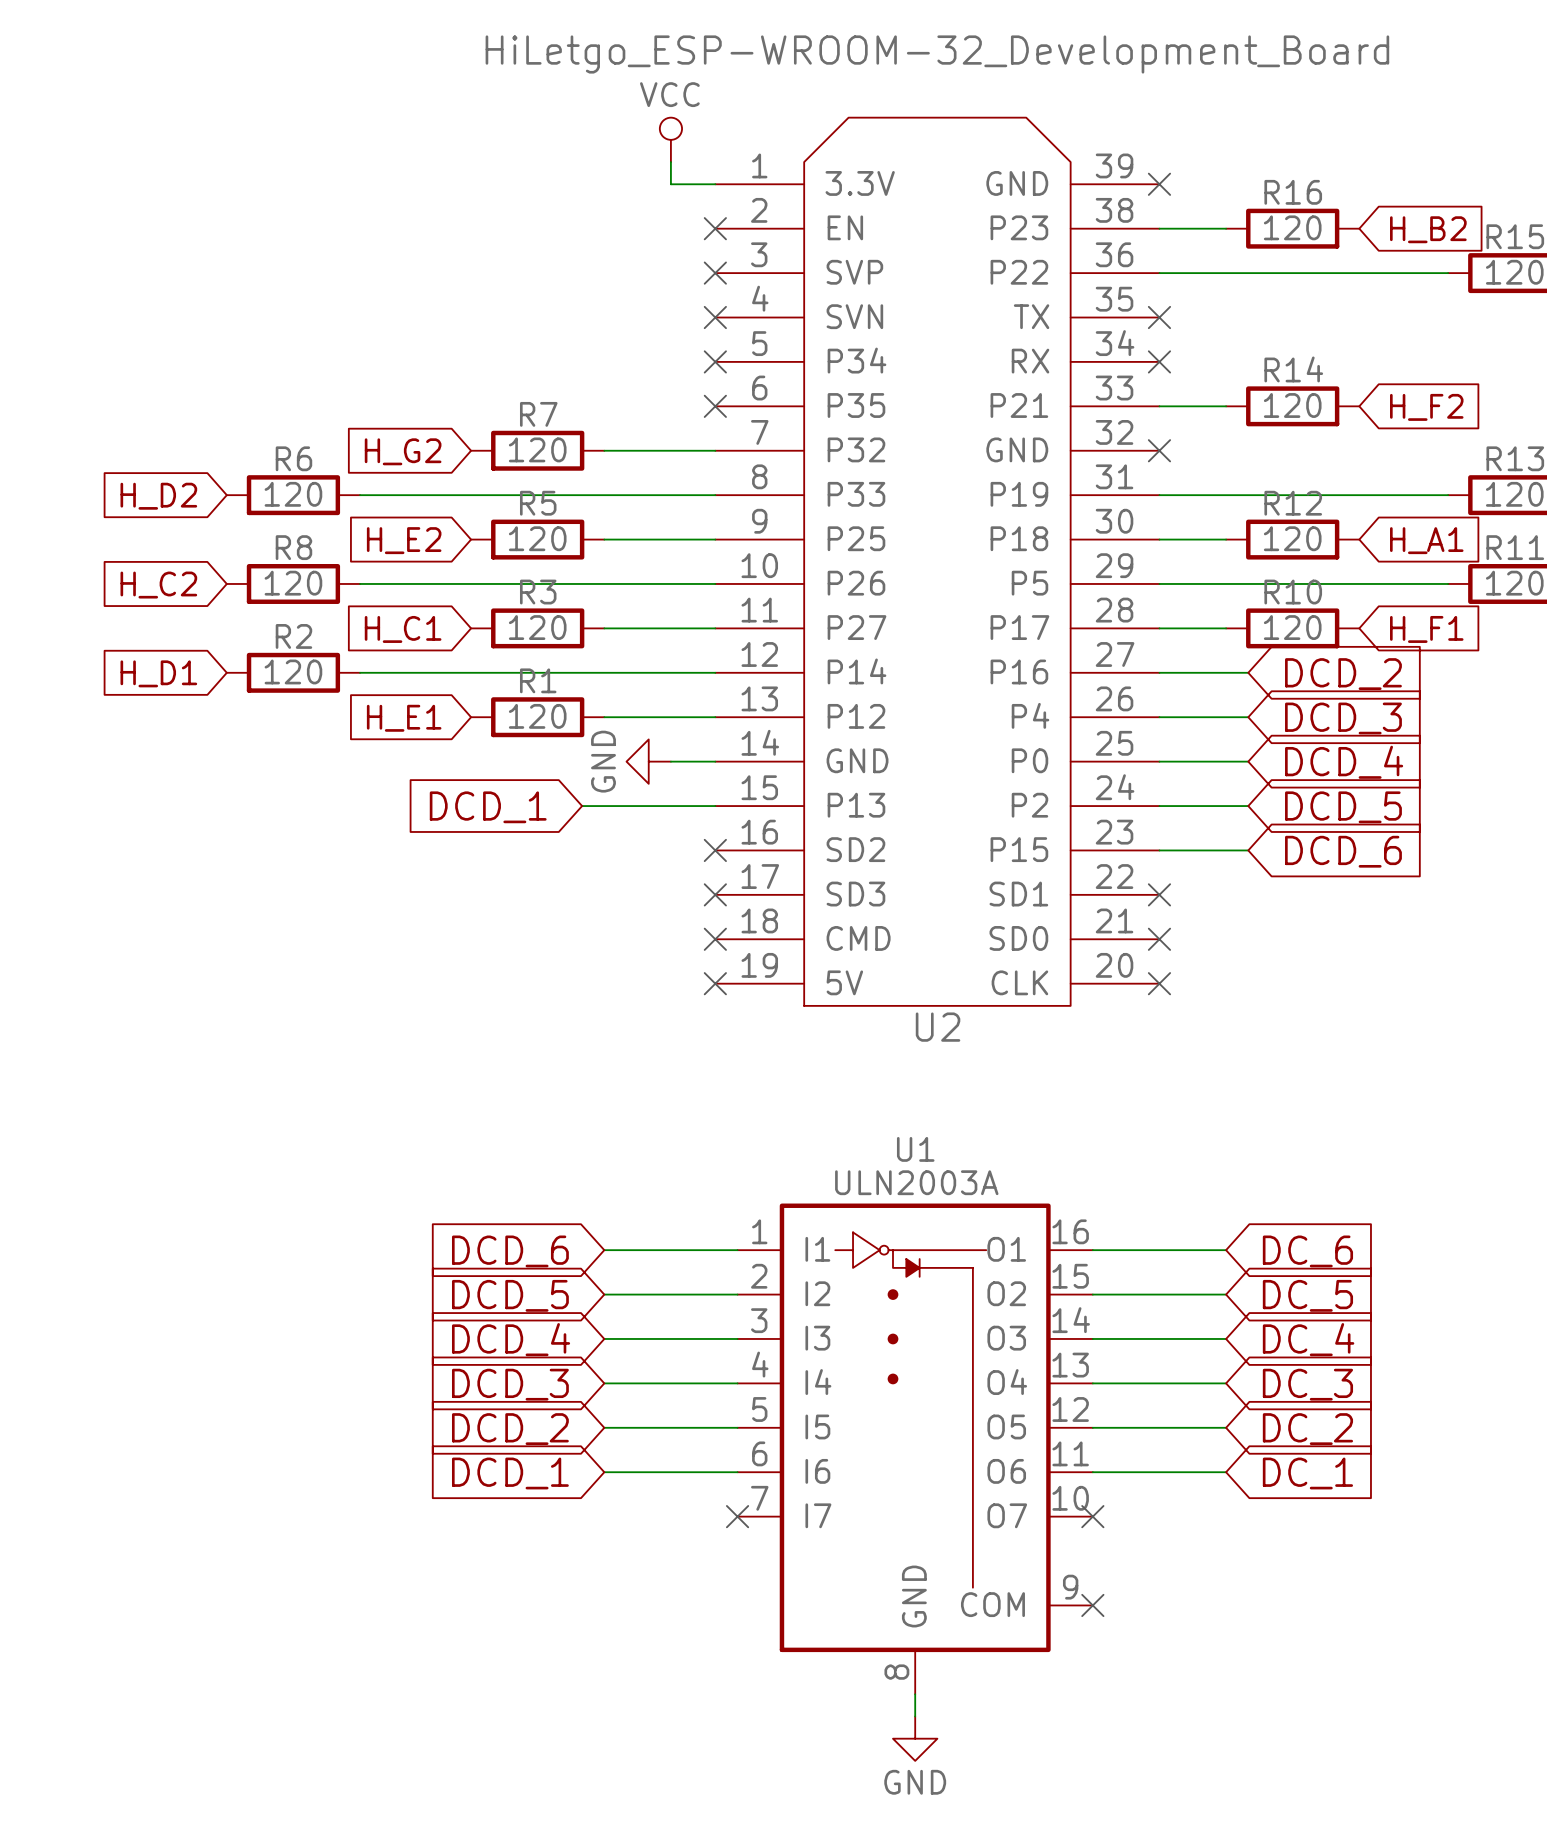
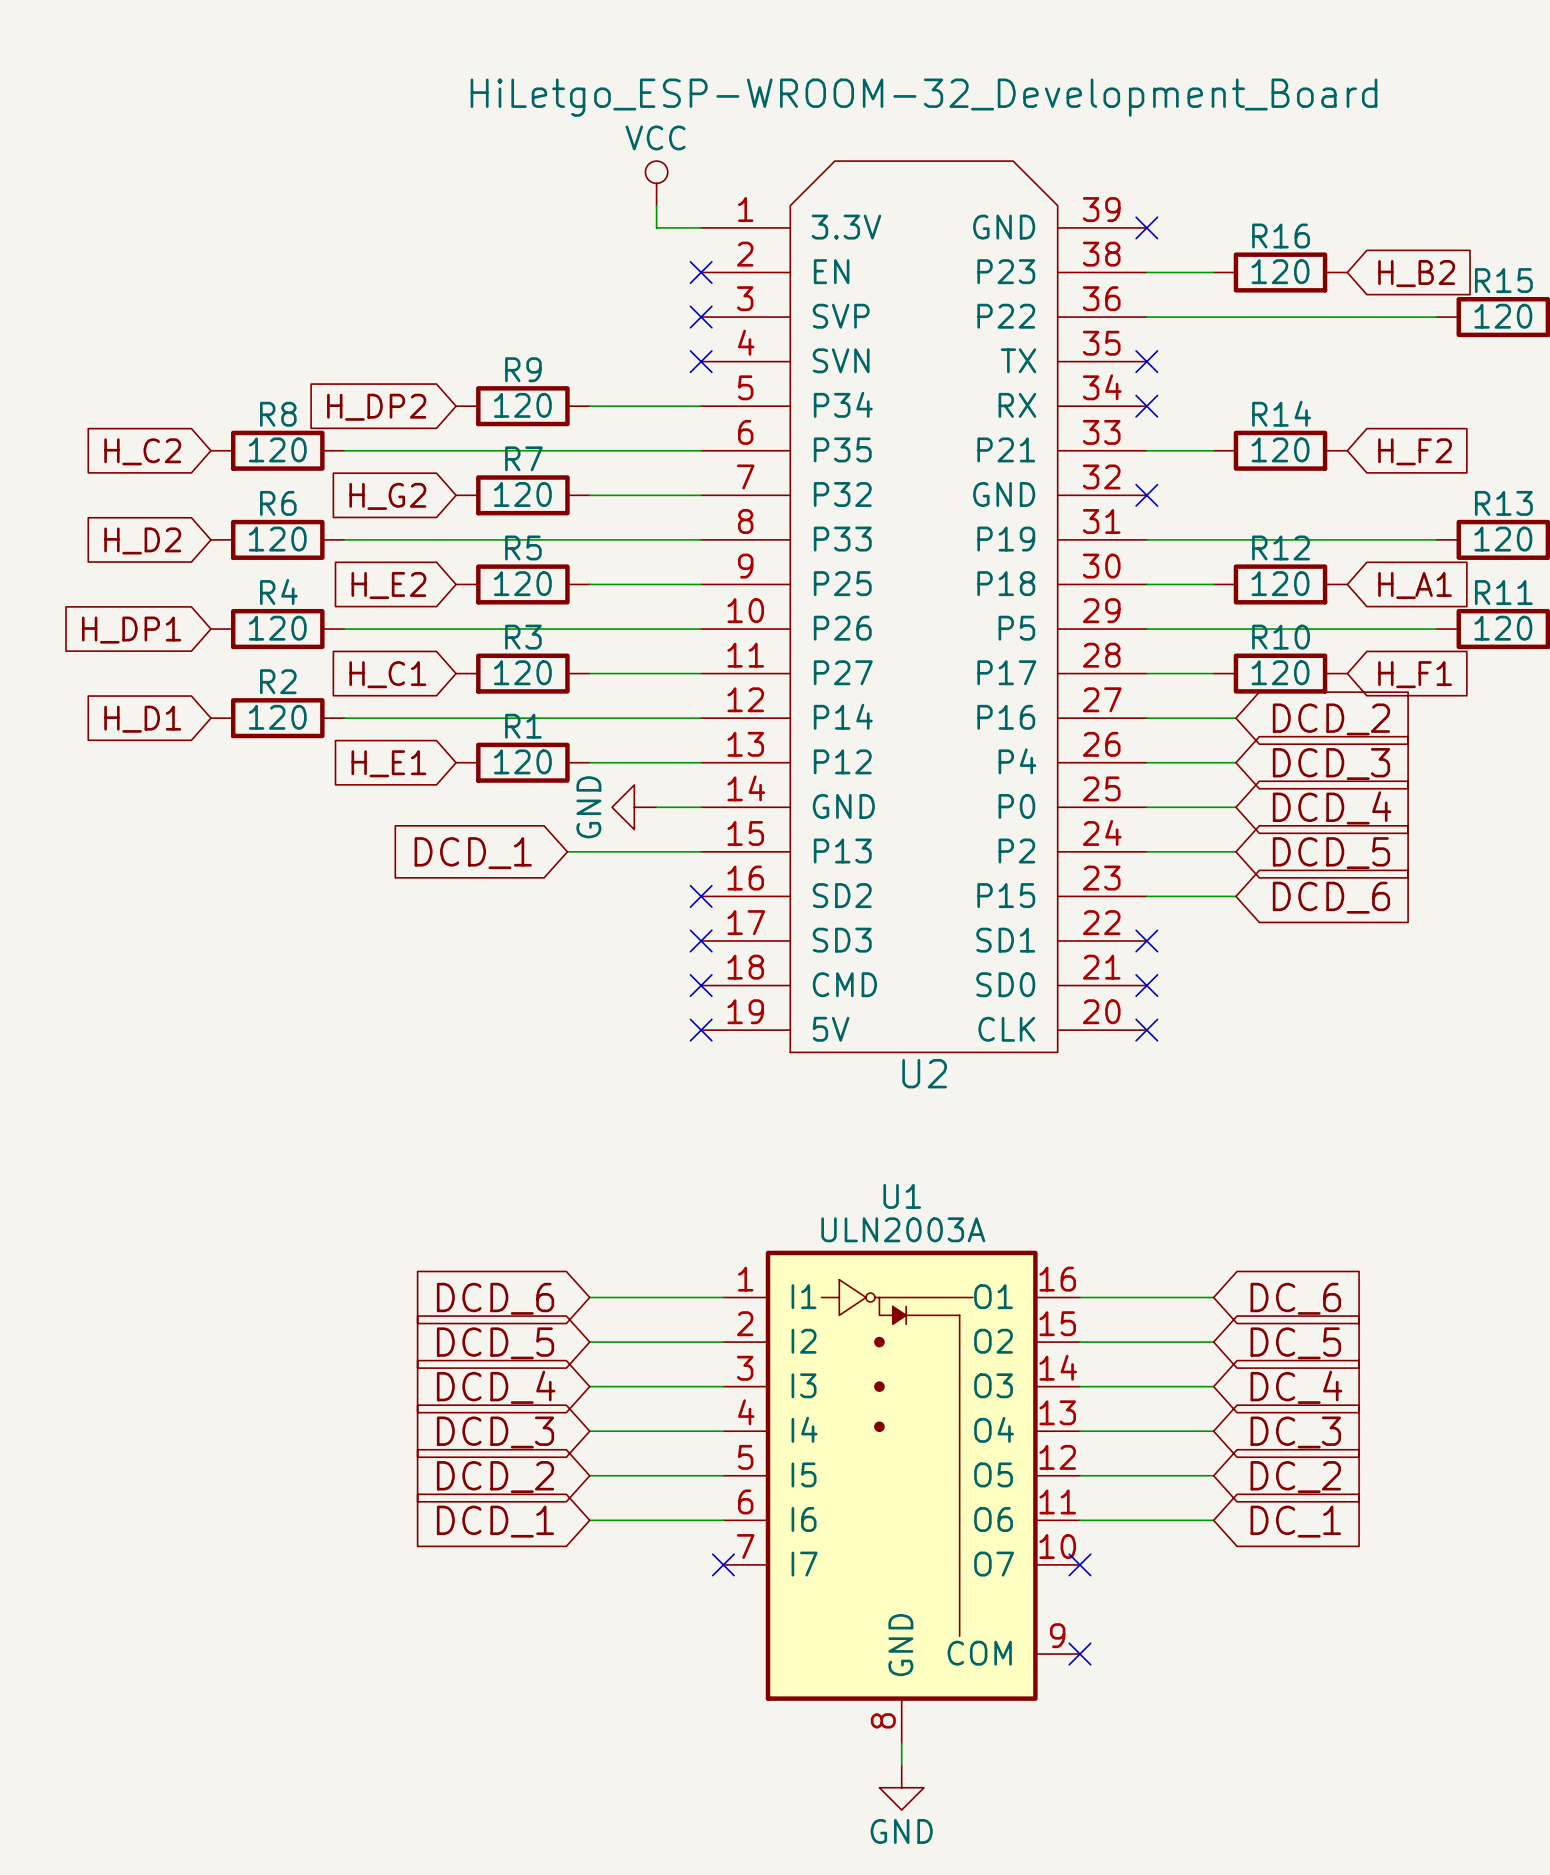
R9: none -> 120 (522, 406)
wire: none -> (589, 406) (701, 406)
no-connect mark: (715, 361) -> none
global label: none -> H_DP2 (376, 407)
R8: none -> 120 (277, 450)
wire: none -> (344, 450) (701, 450)
no-connect mark: (715, 406) -> none
global label: none -> H_C2 (142, 451)
R8 name: R8 (293, 547) -> R4 (278, 592)
global label: H_C2 (158, 585) -> H_DP1 (131, 630)

